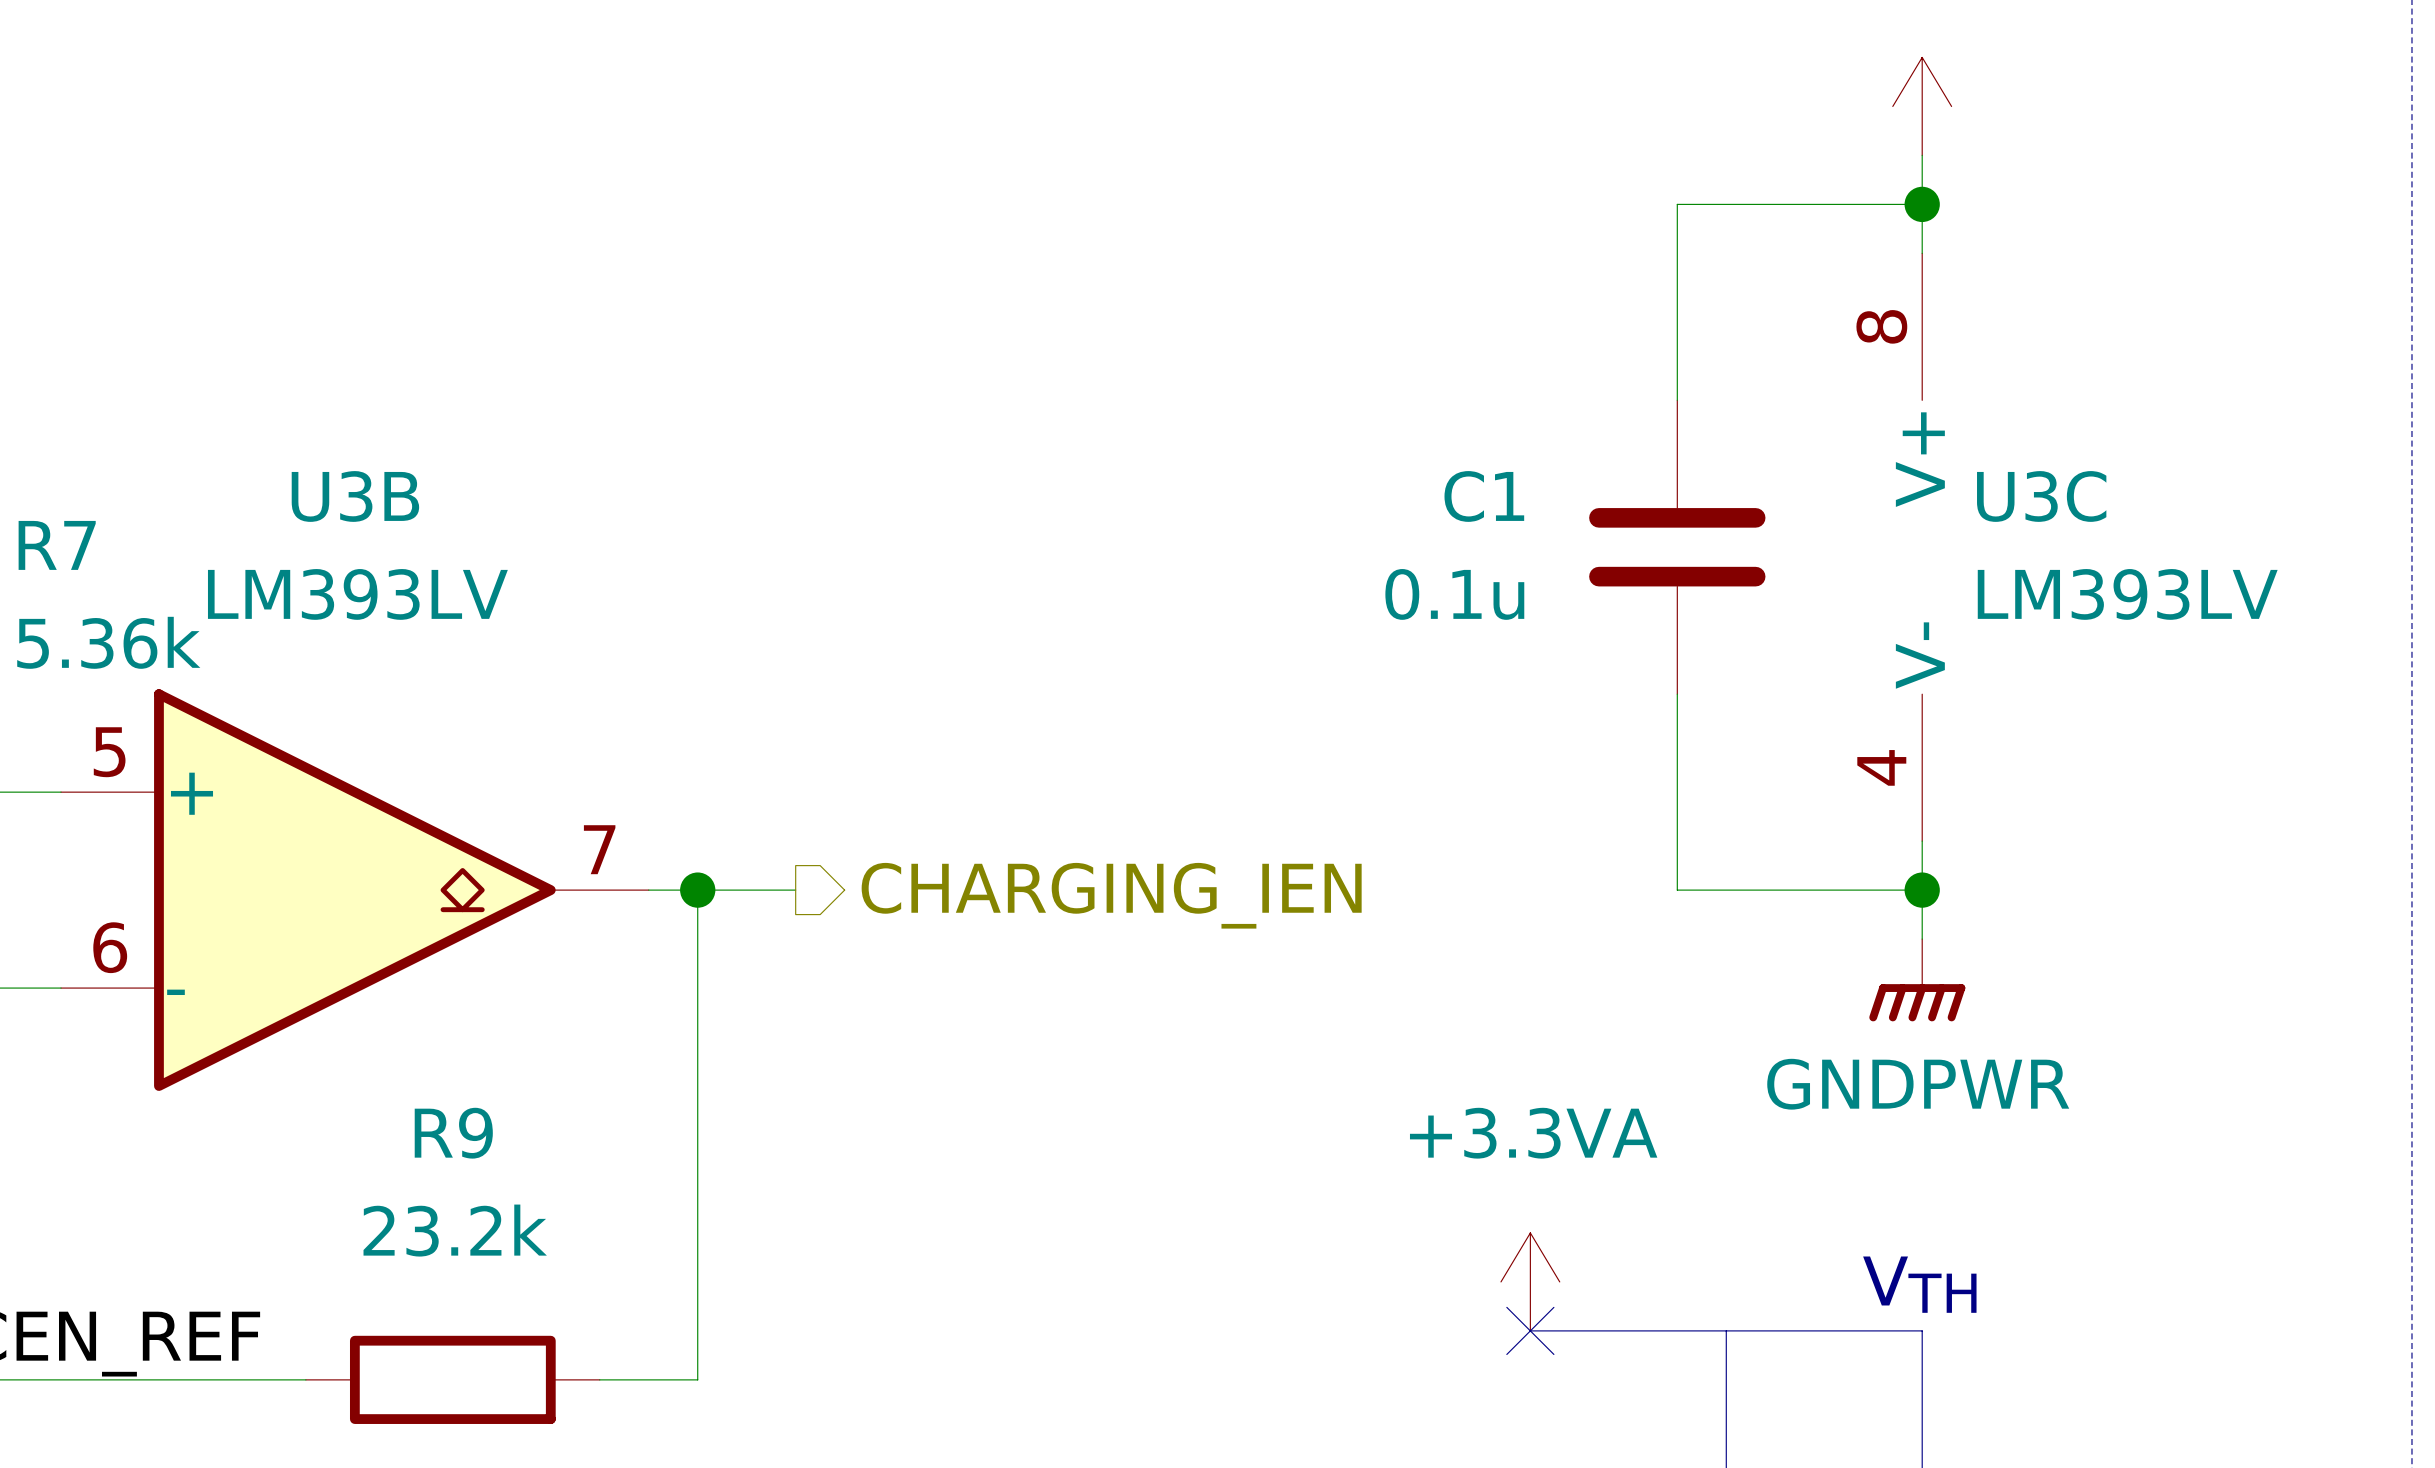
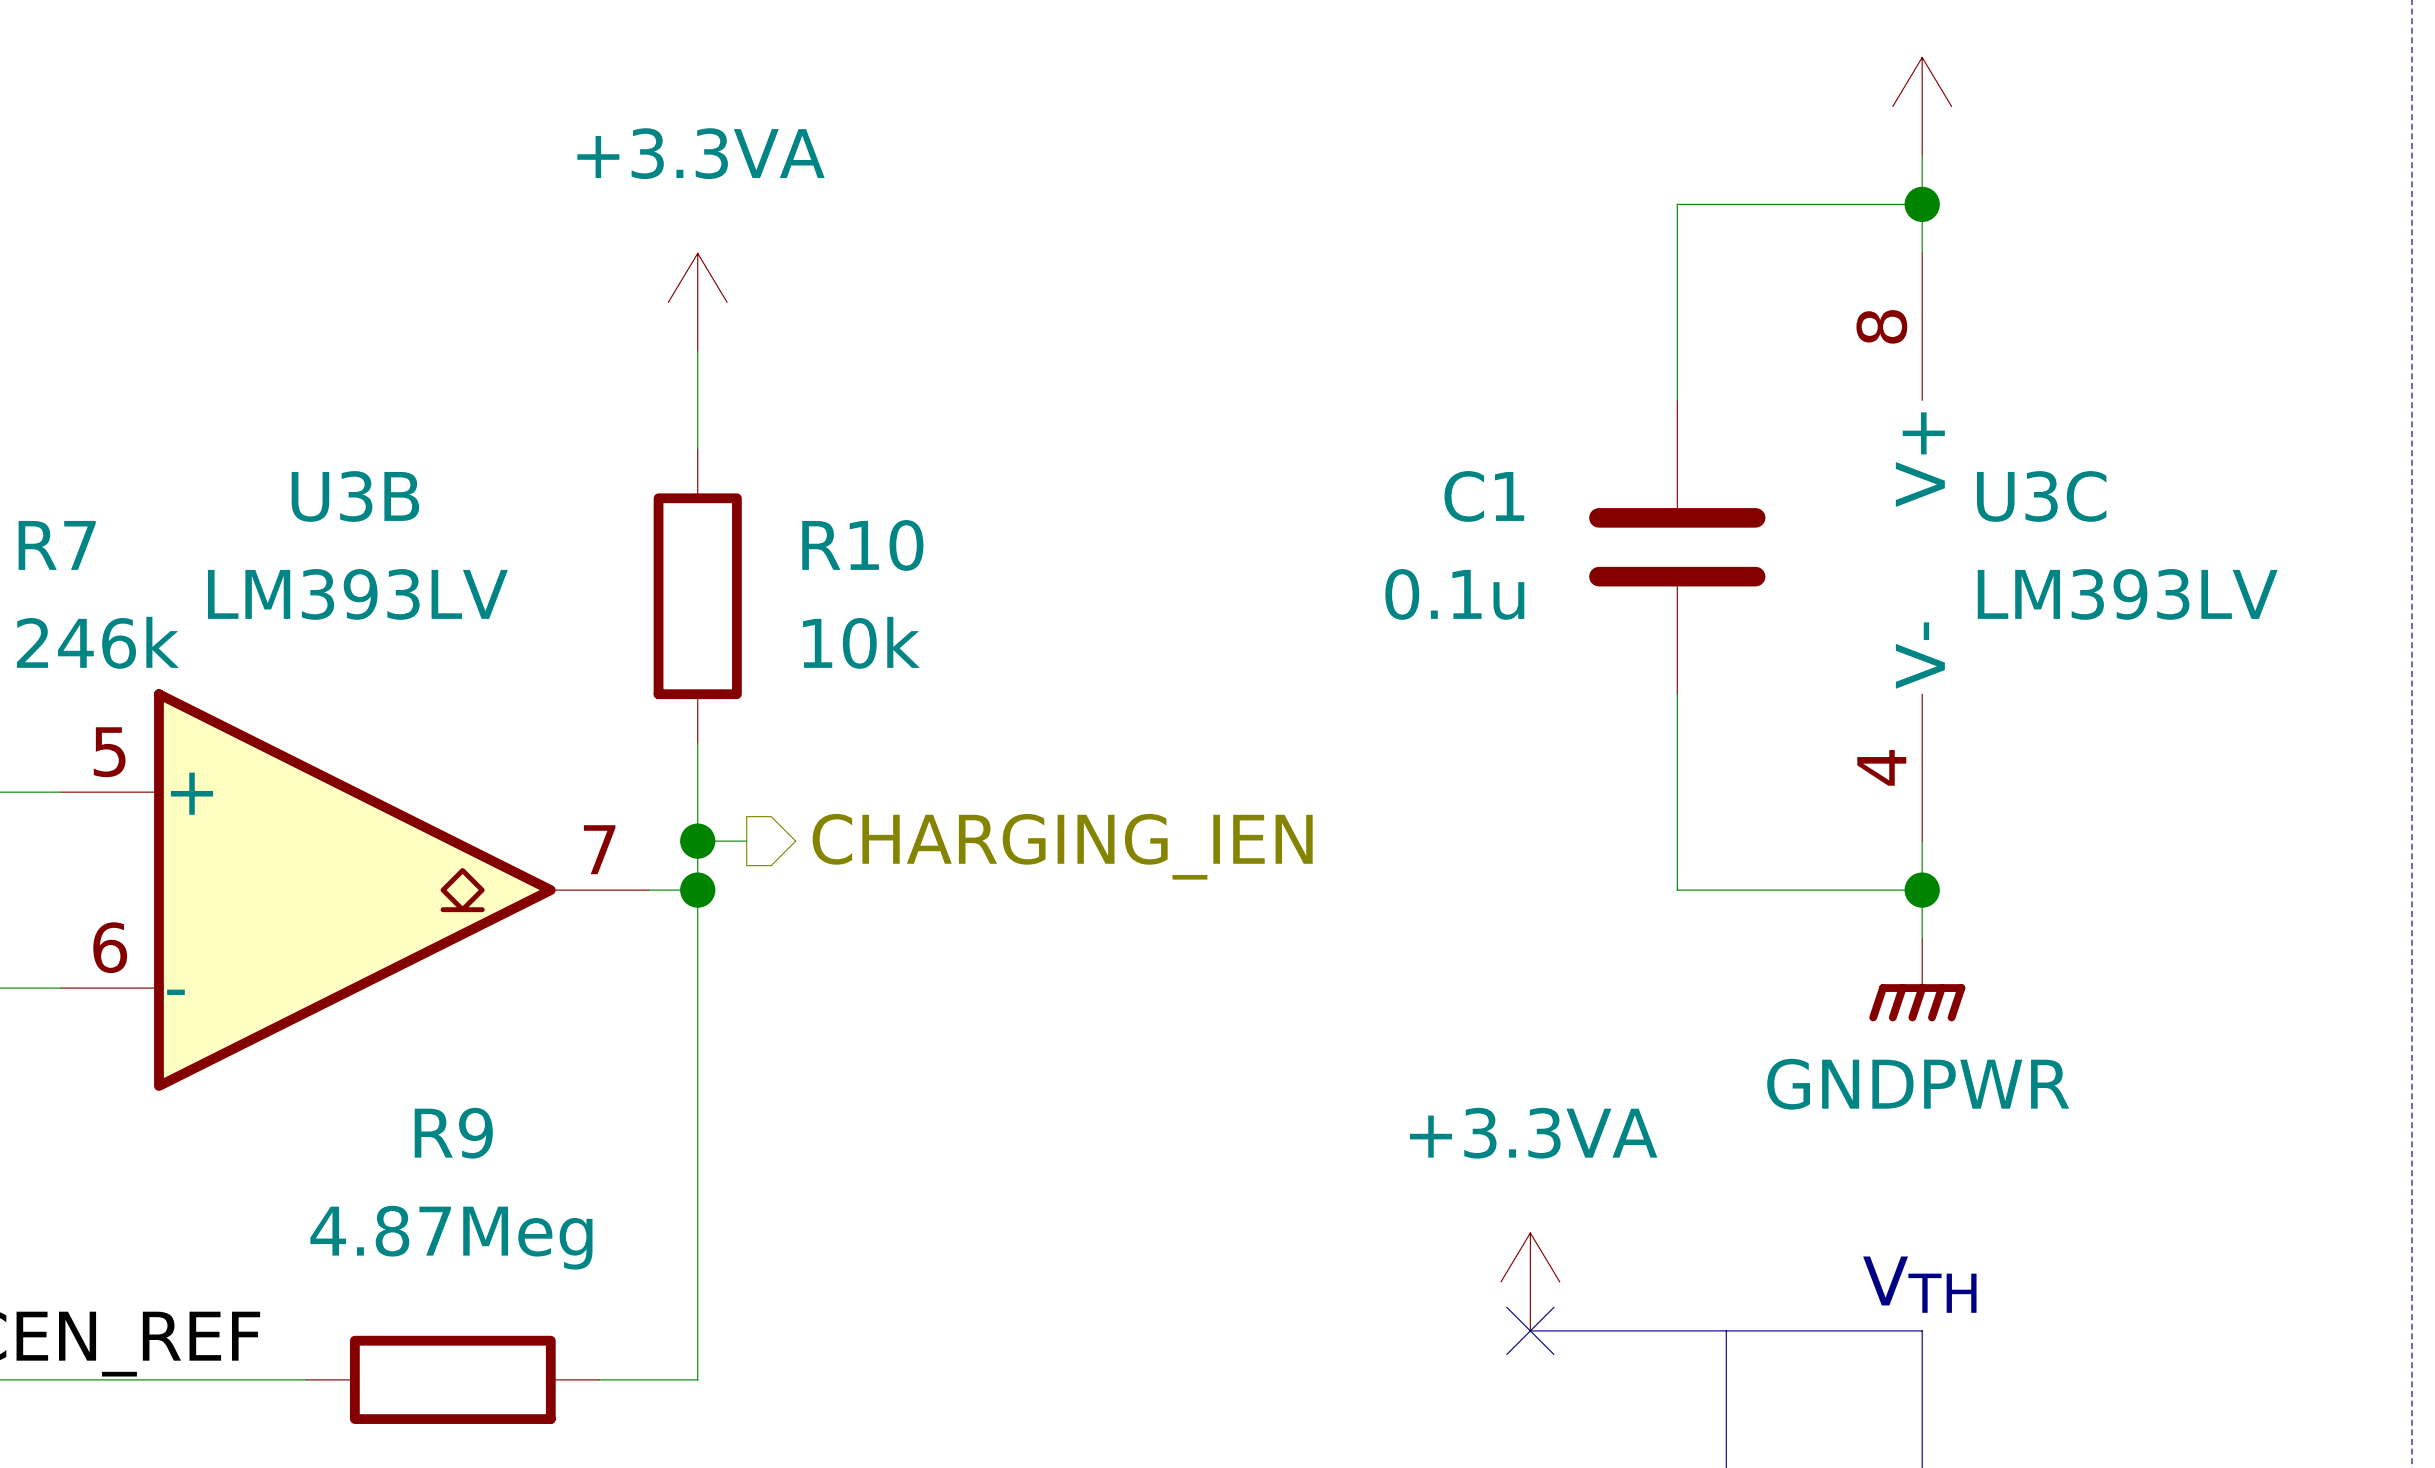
power symbol: none -> +3.3VA (697, 302)
wire: none -> (697, 351) (697, 449)
R10: none -> 10k (697, 596)
R7 value: 5.36k (108, 642) -> 246k (97, 642)
wire: none -> (697, 841) (746, 841)
junction: none -> (697, 841)
wire: (697, 890) (795, 890) -> (697, 890) (697, 743)
hierarchical label position: CHARGING_IEN (1111, 895) -> CHARGING_IEN (1062, 846)
R9 value: 23.2k (455, 1230) -> 4.87Meg (451, 1237)

